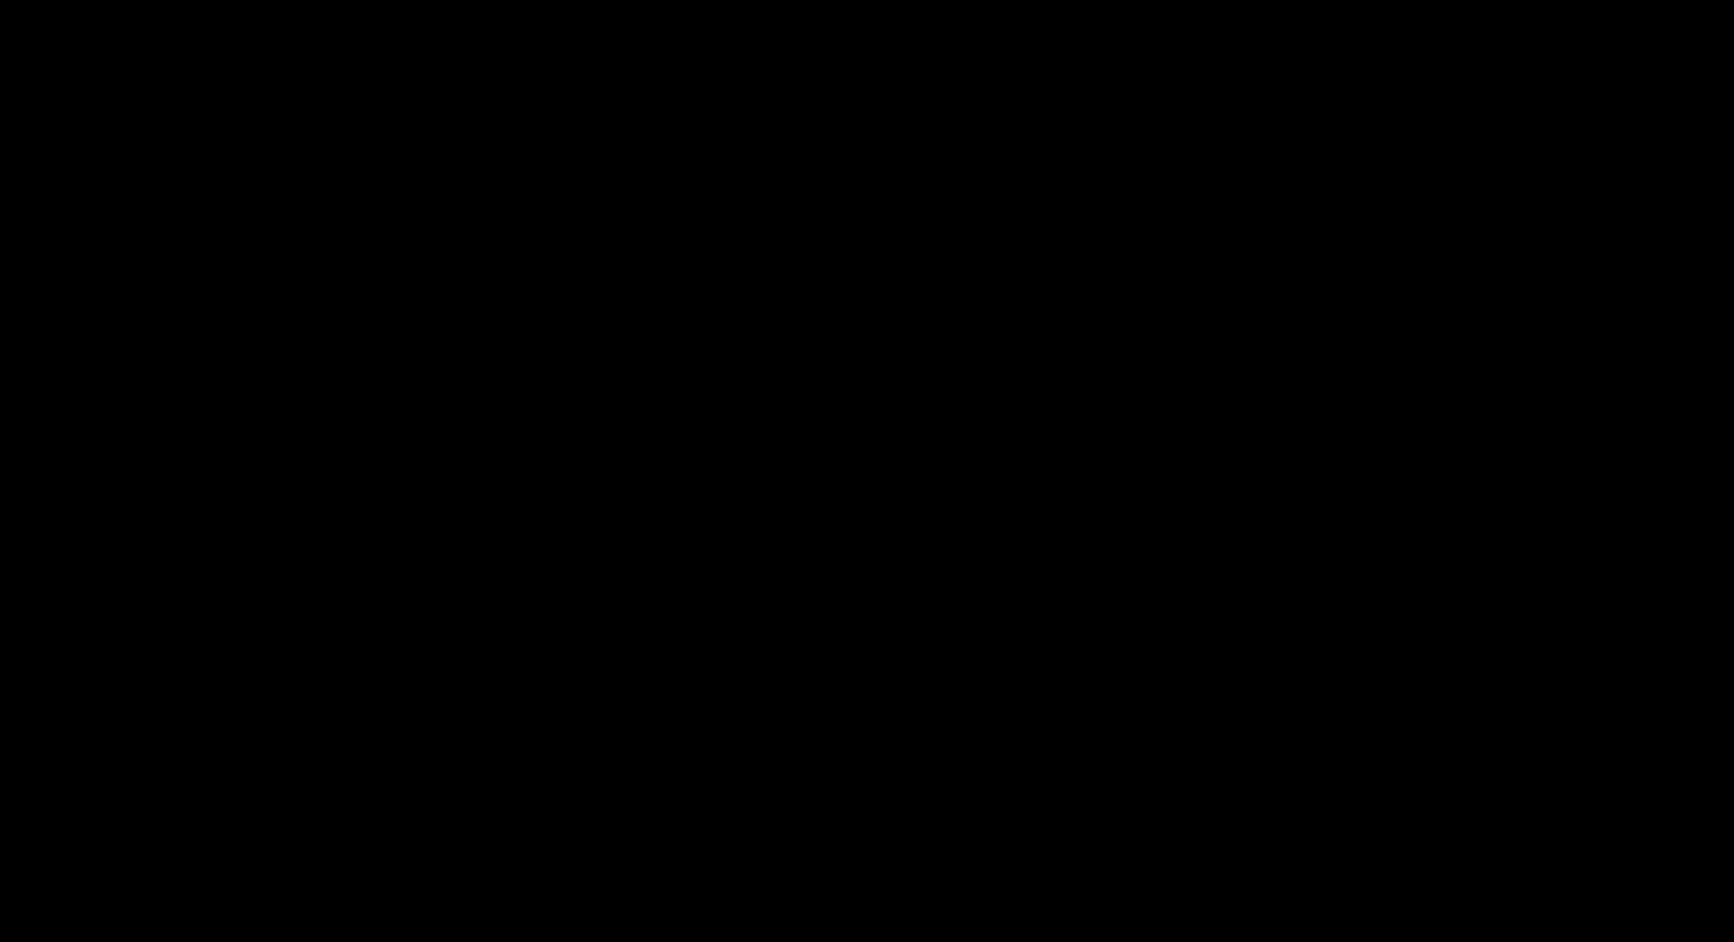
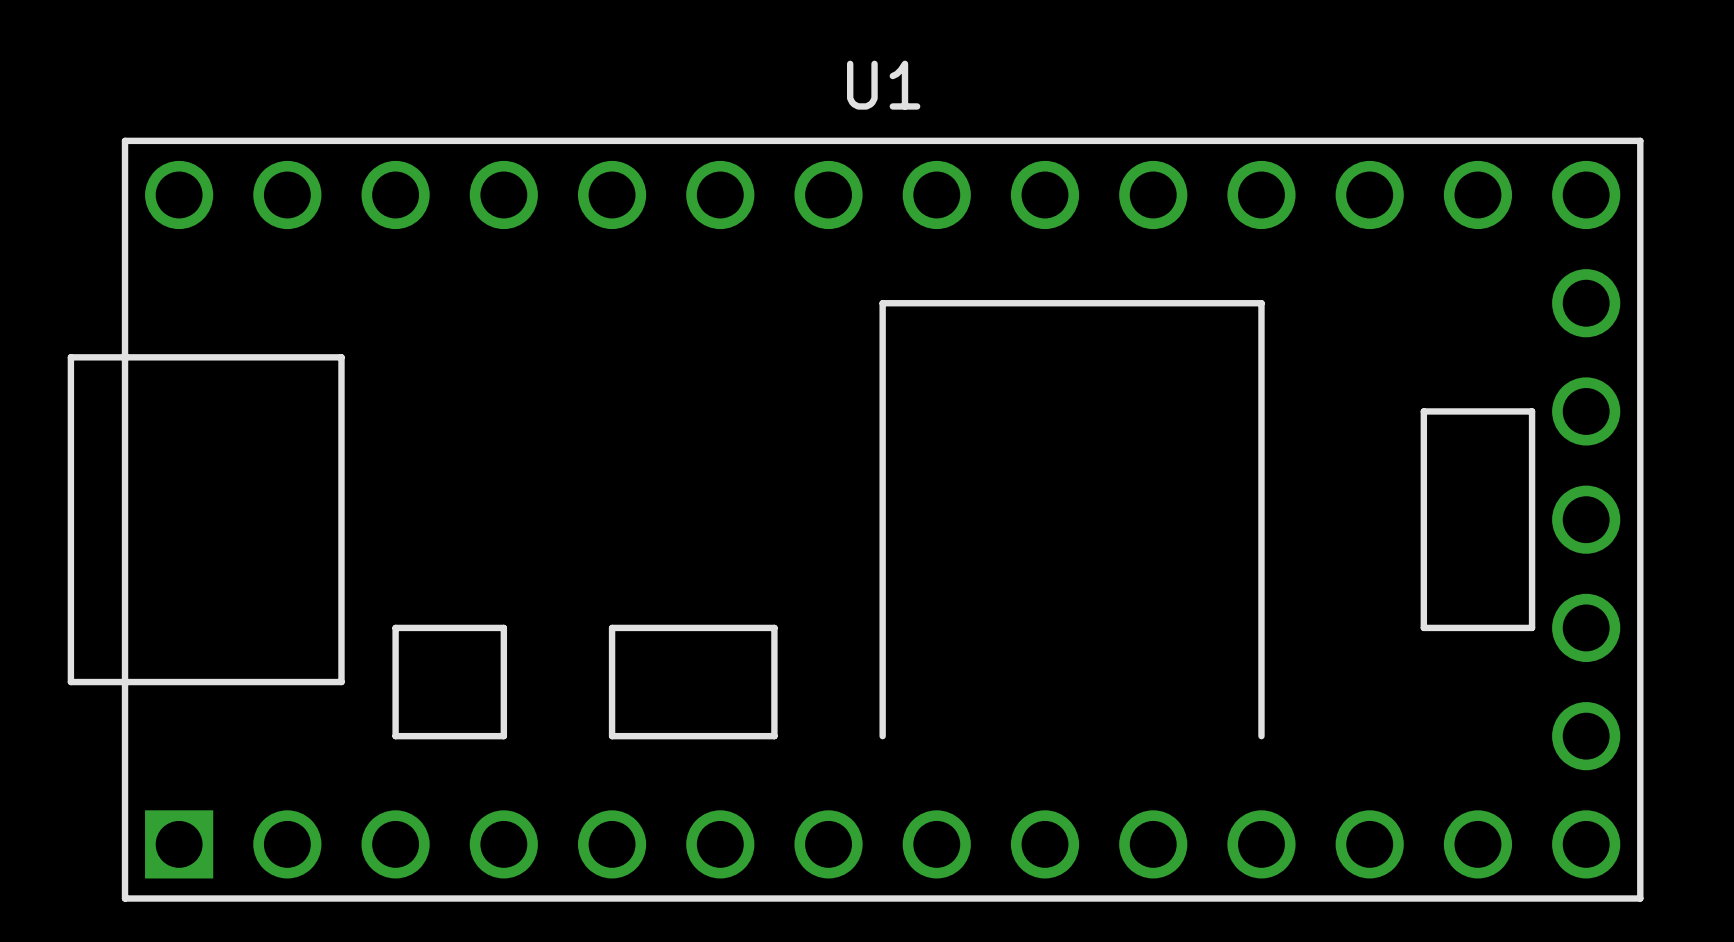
U1: none -> (855, 519)

